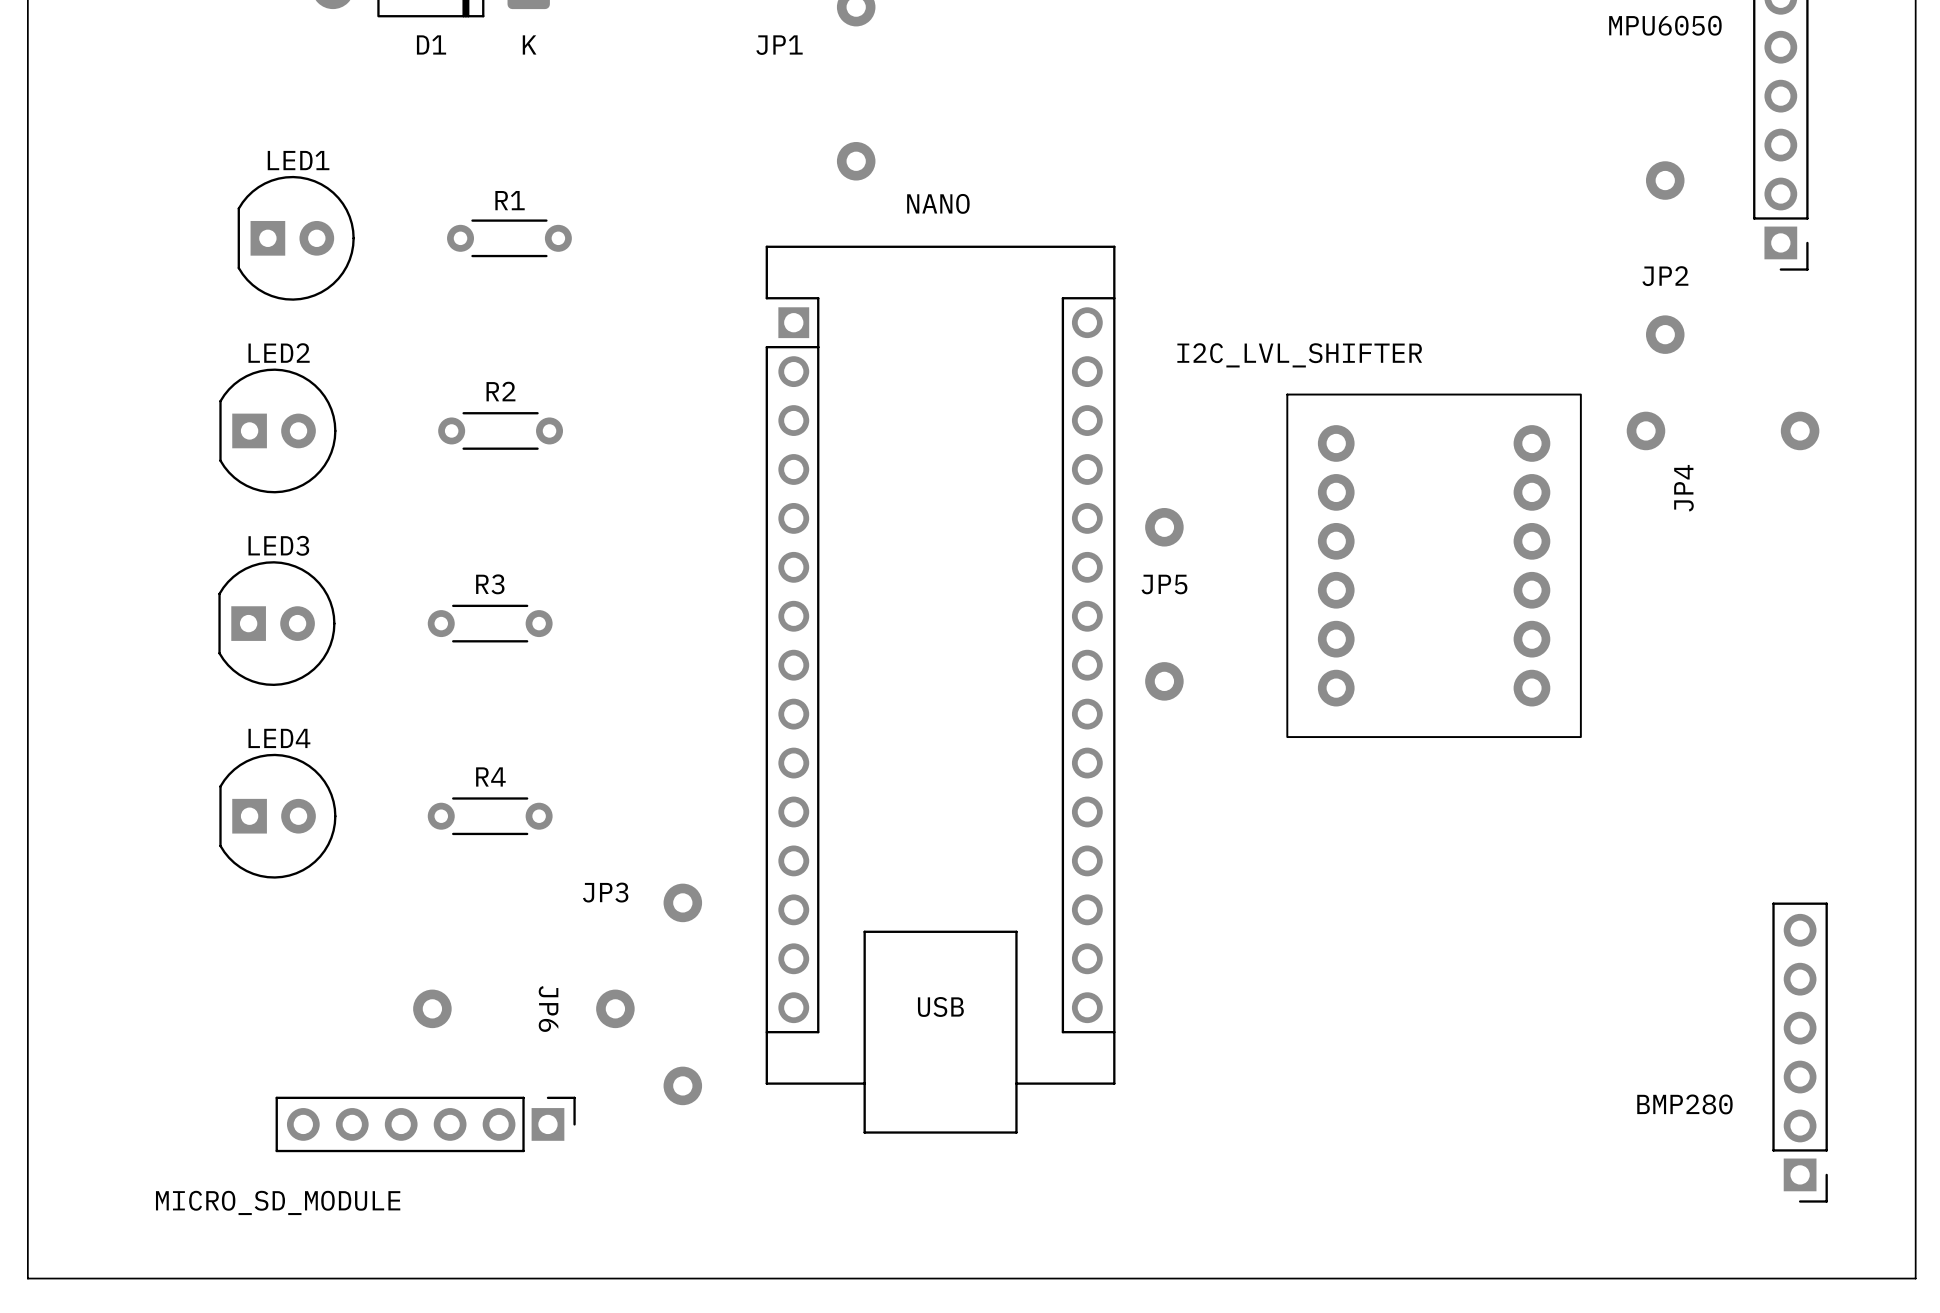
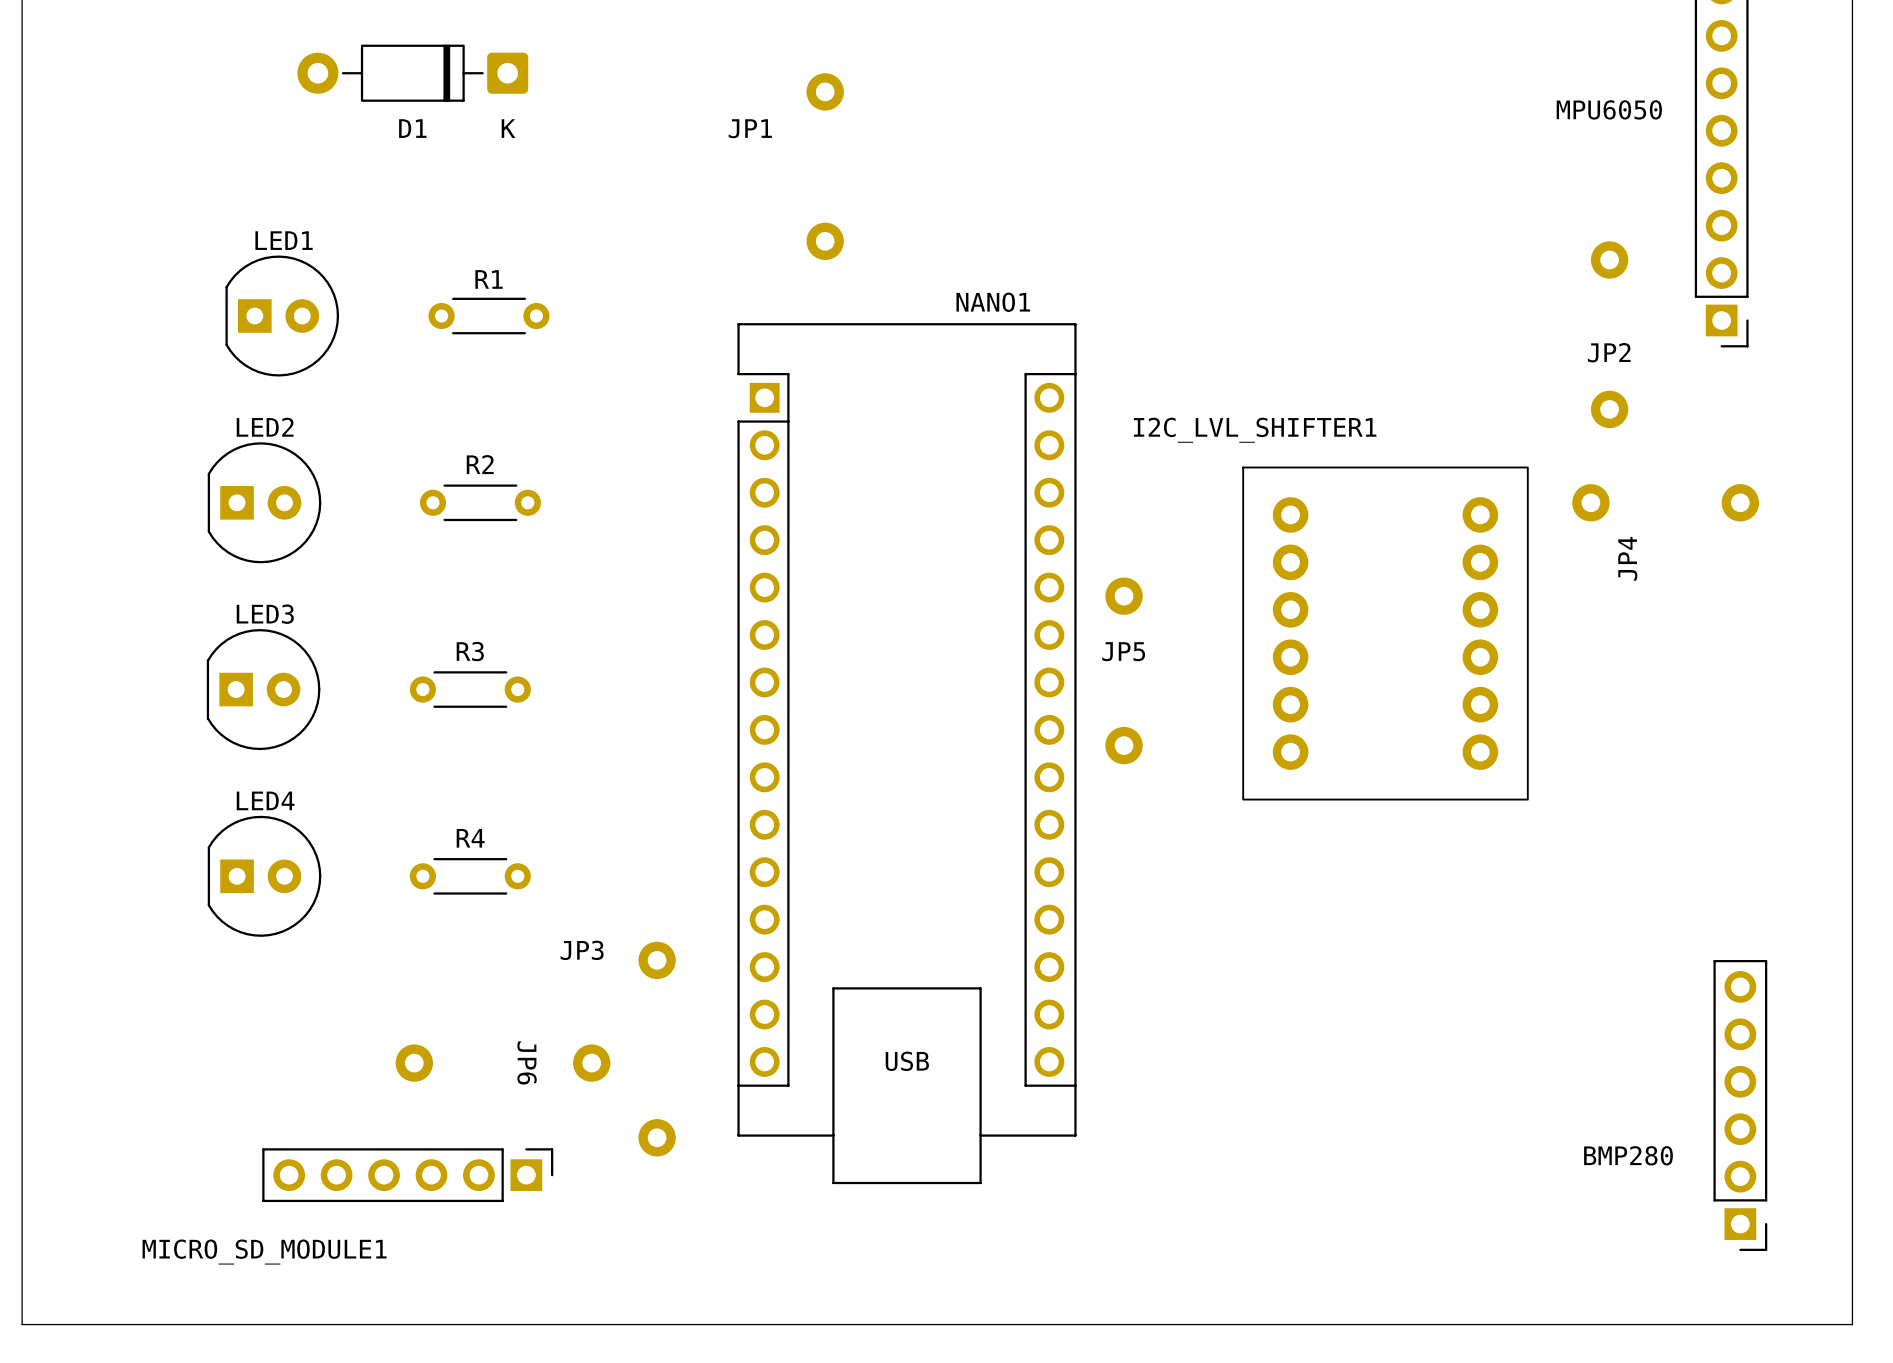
NANO name: NANO (938, 203) -> NANO1 (993, 302)
I2C_LVL_SHIFTER name: I2C_LVL_SHIFTER (1299, 355) -> I2C_LVL_SHIFTER1 (1255, 430)
MICRO_SD_MODULE name: MICRO_SD_MODULE (278, 1202) -> MICRO_SD_MODULE1 (264, 1252)

